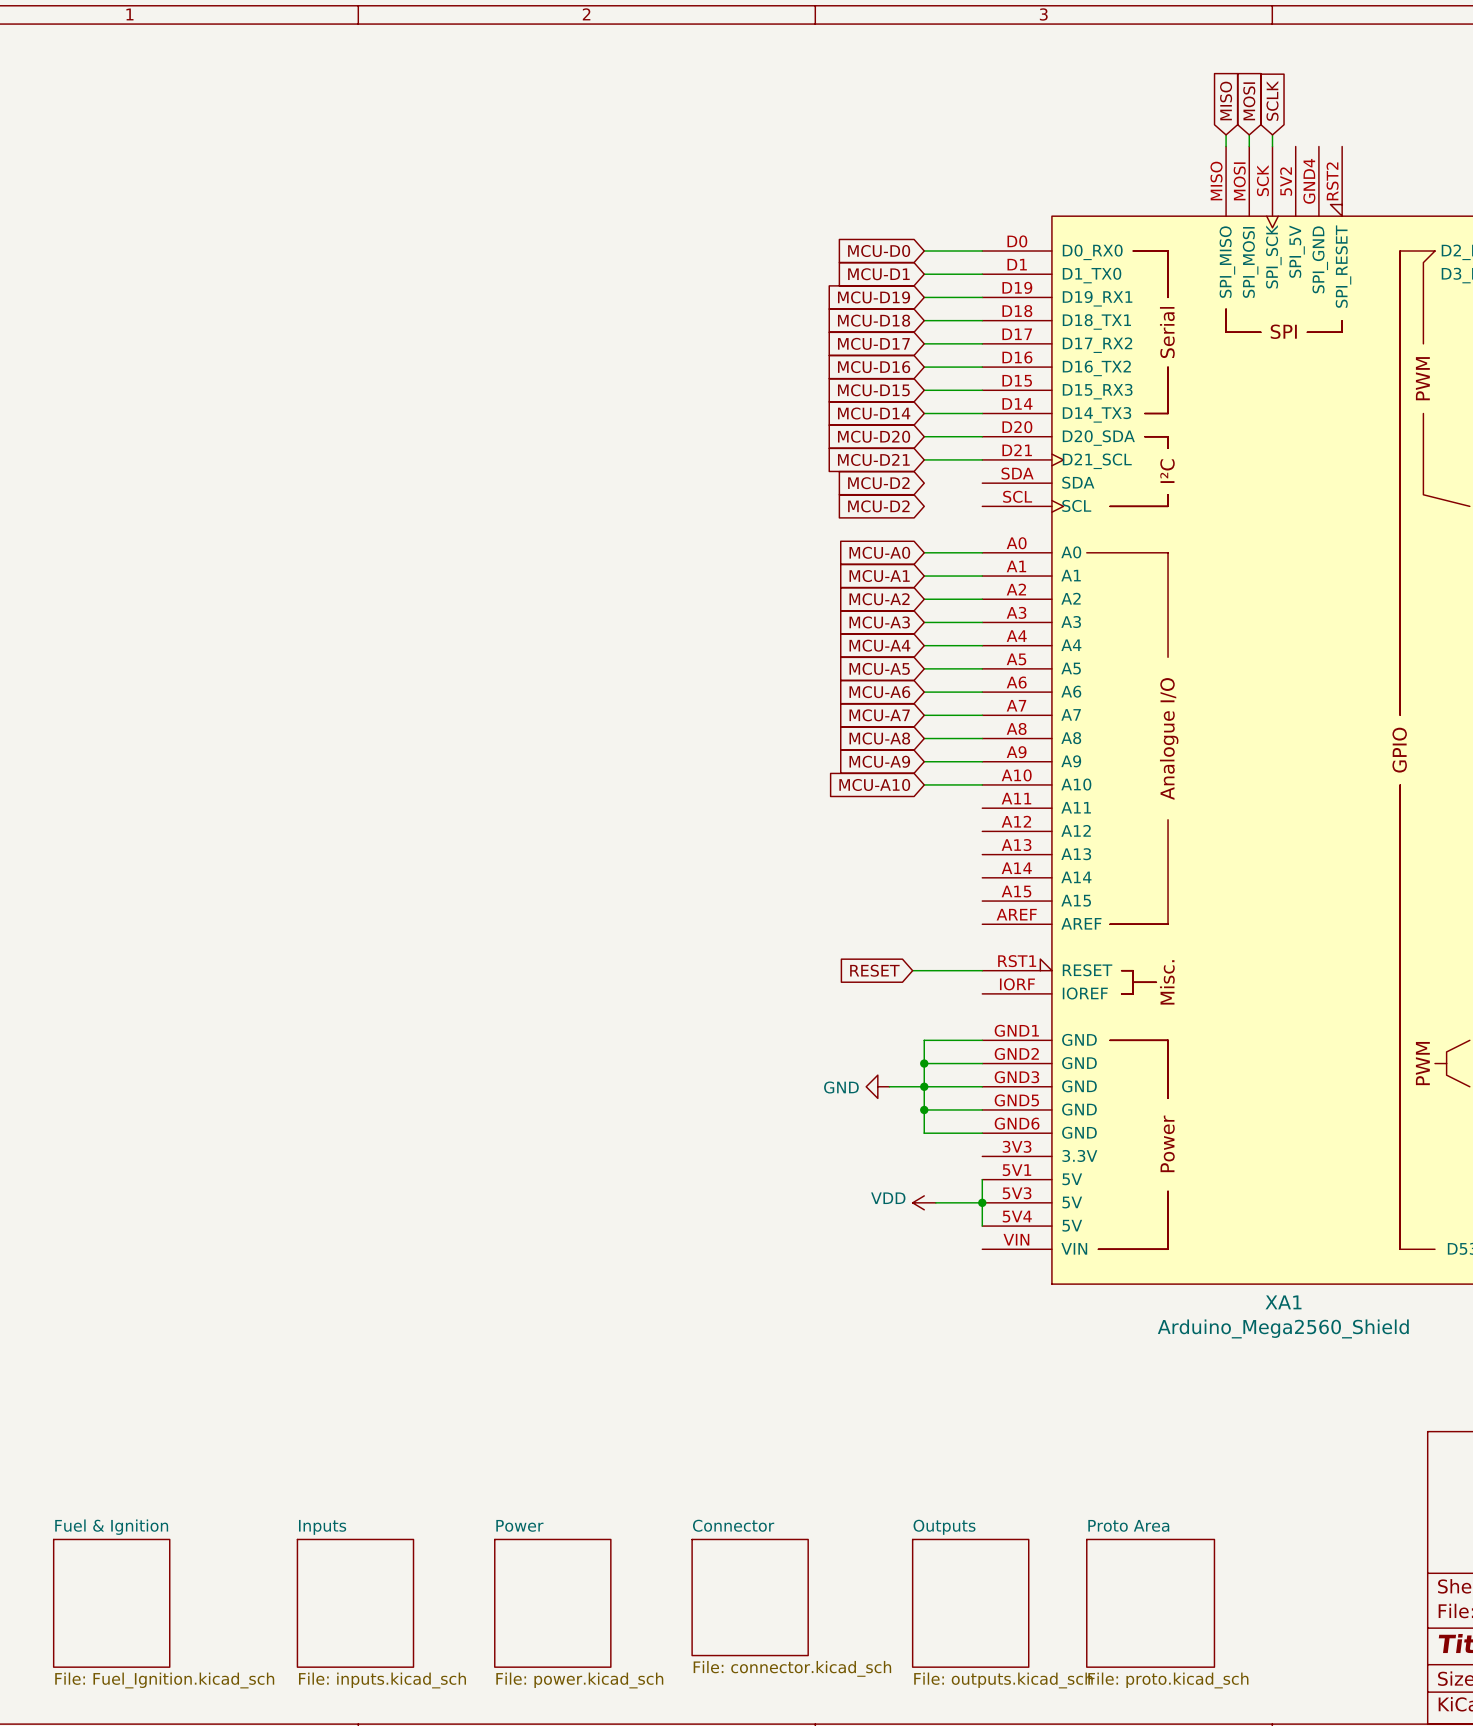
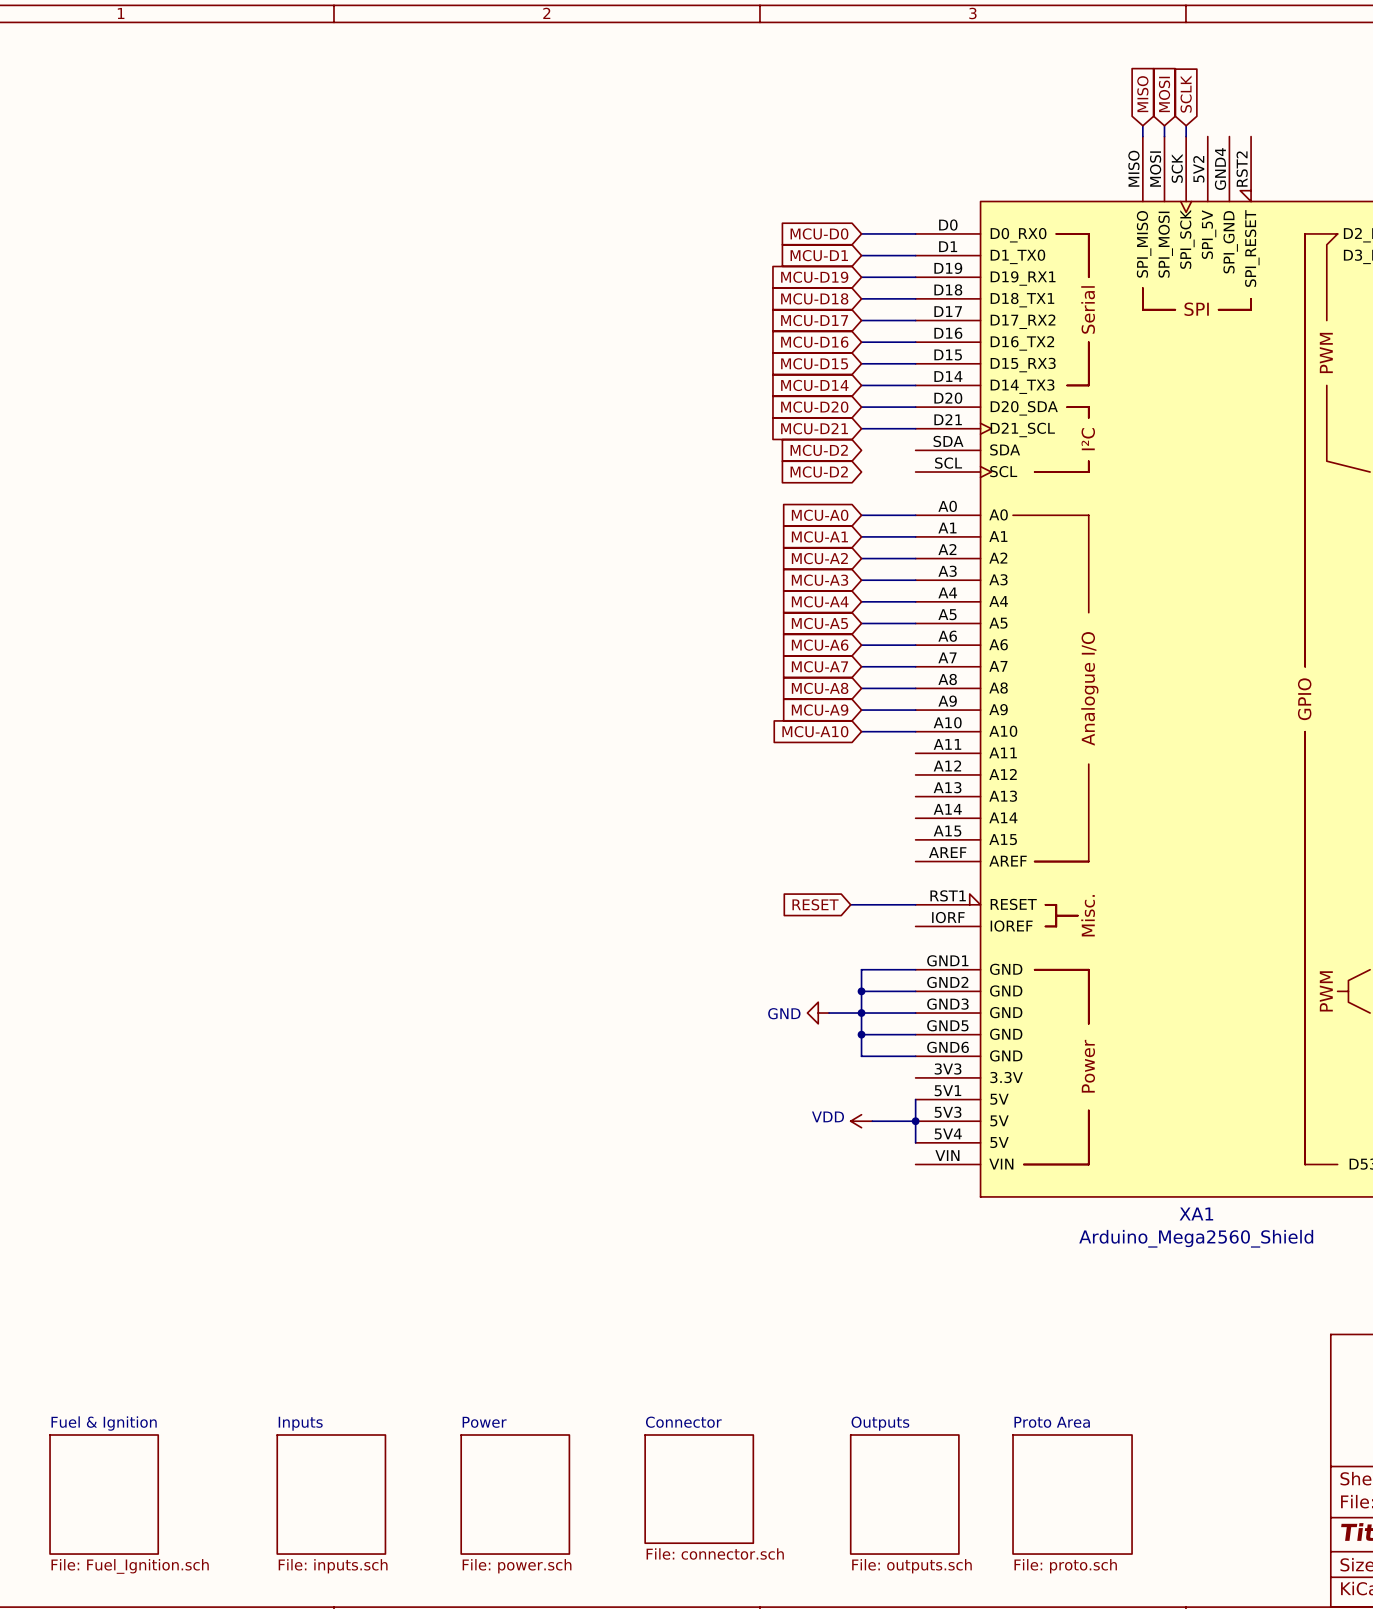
sheet Connector value: File: connector.kicad_sch (792, 1668) -> File: connector.sch (715, 1553)
sheet Fuel & Ignition value: File: Fuel_Ignition.kicad_sch (164, 1680) -> File: Fuel_Ignition.sch (130, 1566)
sheet Inputs value: File: inputs.kicad_sch (382, 1680) -> File: inputs.sch (333, 1566)
sheet Power value: File: power.kicad_sch (579, 1680) -> File: power.sch (517, 1566)
sheet Outputs value: File: outputs.kicad_sch (1003, 1680) -> File: outputs.sch (911, 1566)
sheet Proto Area value: File: proto.kicad_sch (1168, 1680) -> File: proto.sch (1065, 1566)

